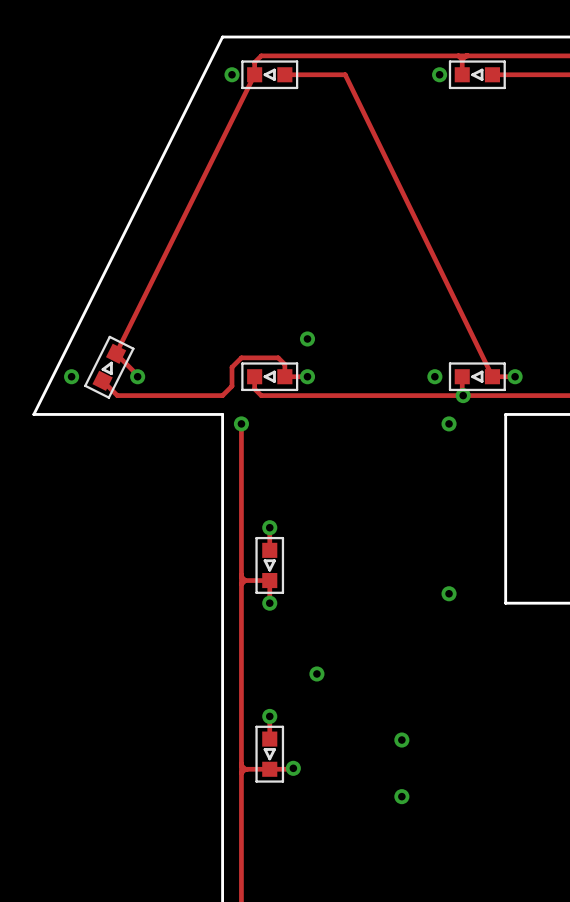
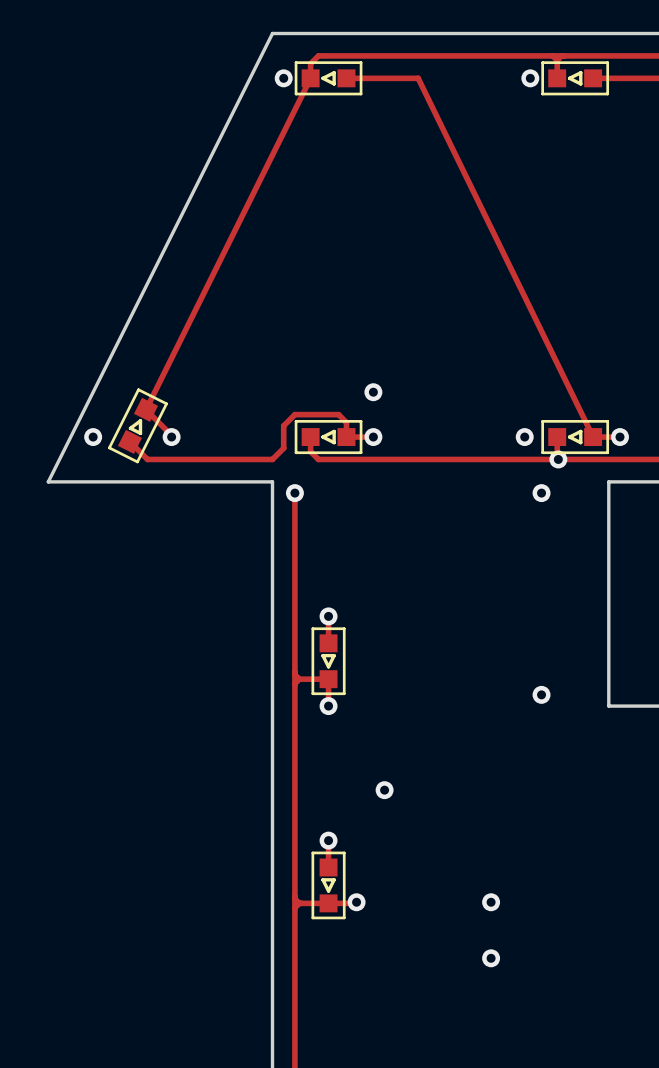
via: (401, 740) -> none
via: none -> (491, 902)
via: (401, 796) -> none
via: none -> (491, 958)

